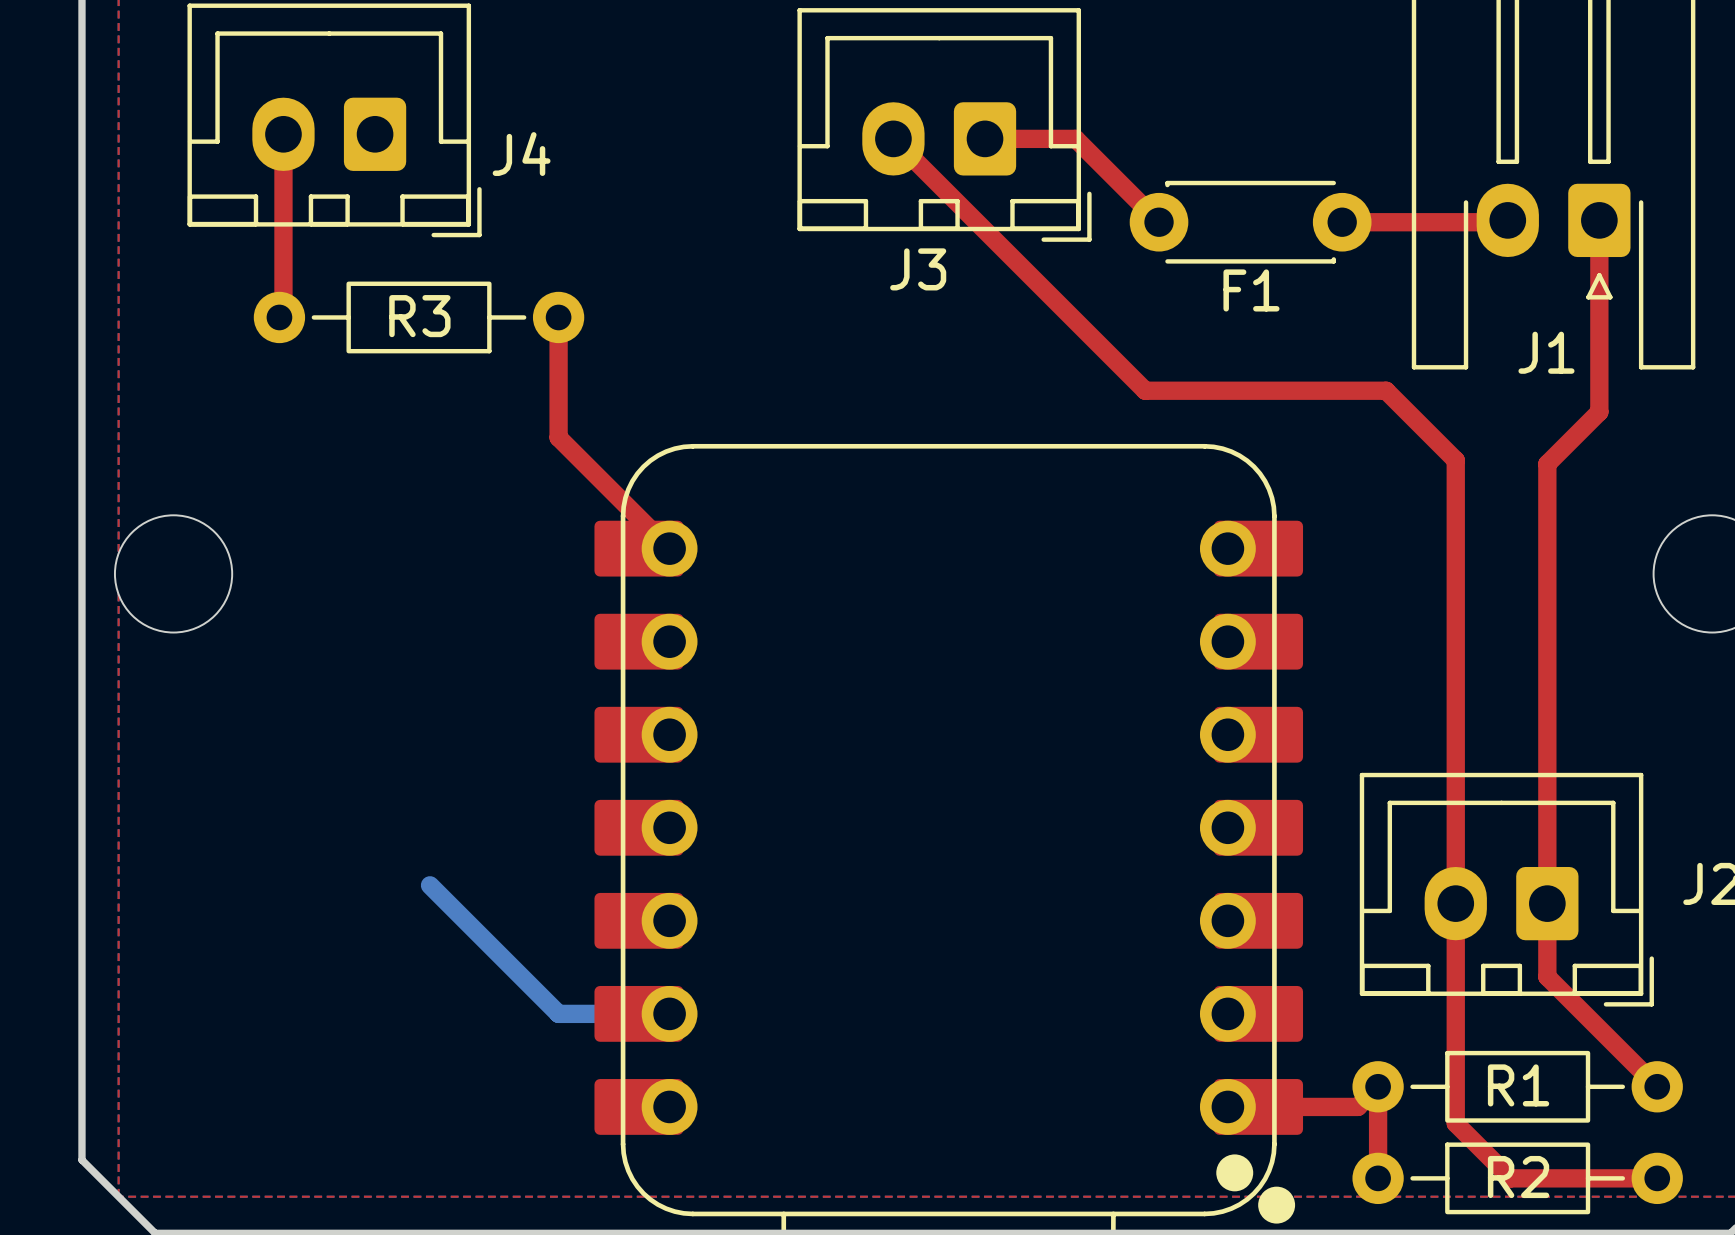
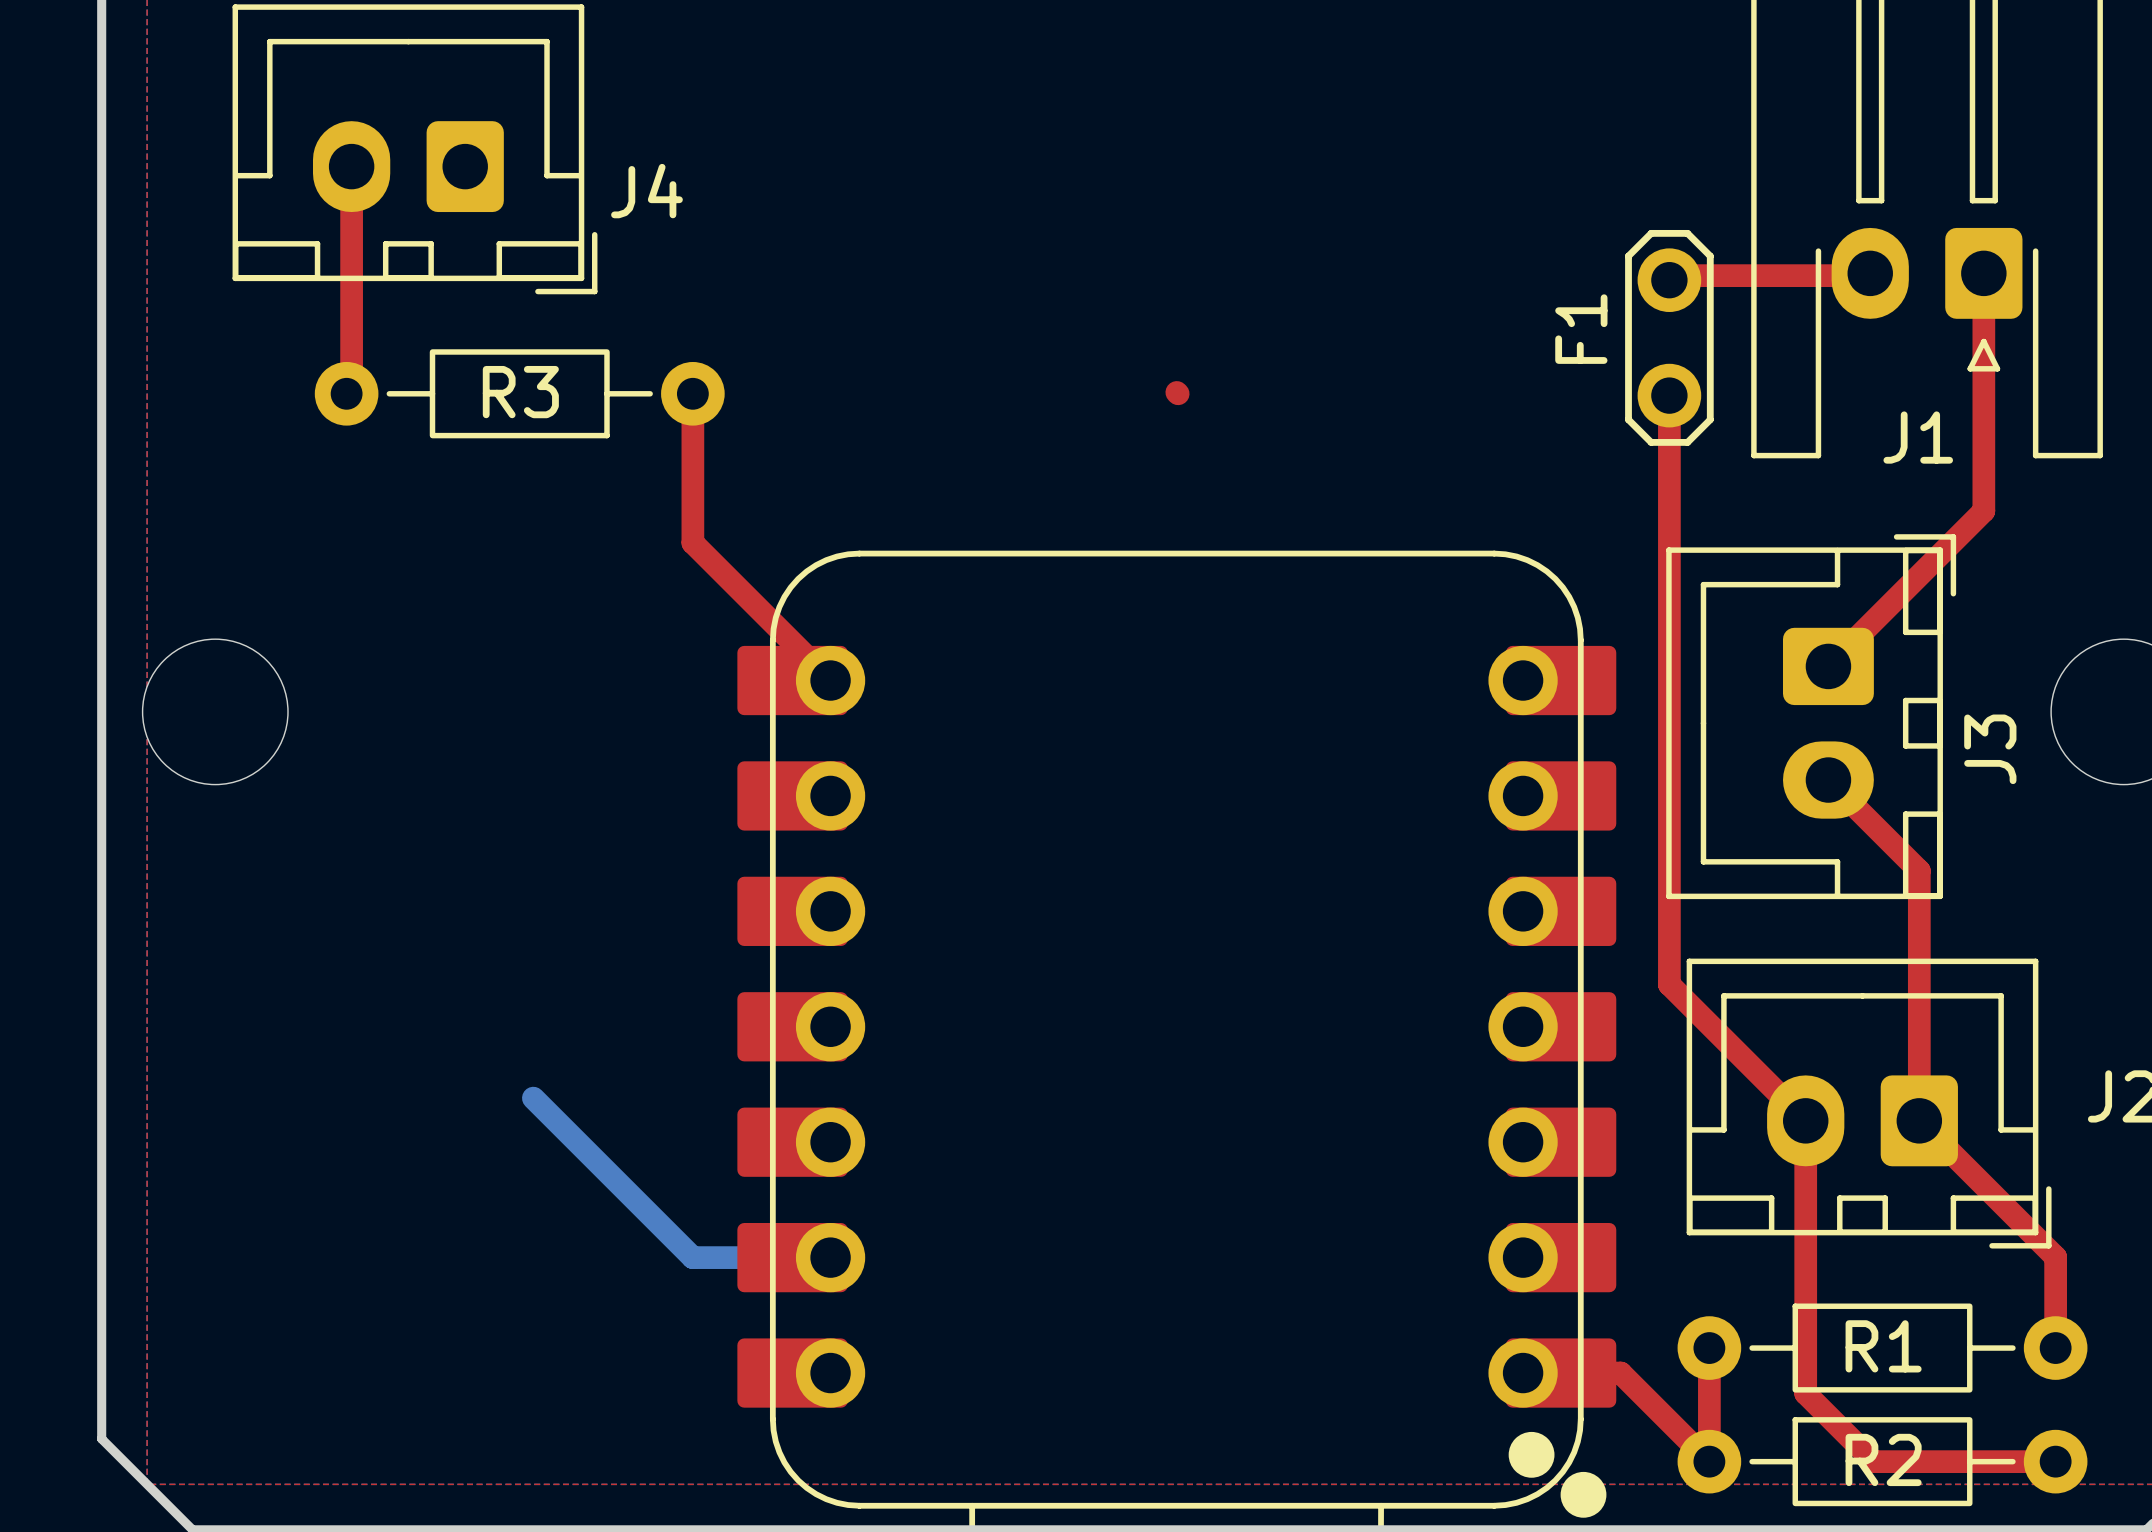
J3 rotation: 0° (944, 124) -> 90° counterclockwise (1811, 716)
J3 position: (944, 124) -> (1811, 716)
top track: (893, 138) (1145, 390) (1386, 390) (1455, 460) (1455, 903) -> (1669, 395) (1669, 984) (1805, 1120)
top track: (985, 138) (1075, 138) (1159, 222) -> none
F1 footprint: [1129, 180, 1372, 264] -> [1625, 229, 1714, 446]
F1 name position: F1 (1251, 290) -> F1 (1581, 329)
top track: none -> (1176, 392) (1178, 393)
top track: (1547, 464) (1547, 702) -> (1919, 575) (1828, 666)
top track: none -> (1828, 780) (1919, 870)
top track: (1547, 903) (1547, 976) (1657, 1086) -> (1919, 1120) (2055, 1257) (2055, 1348)
top track: (1378, 1086) (1357, 1106) (1306, 1106) -> (1709, 1461) (1620, 1373)

